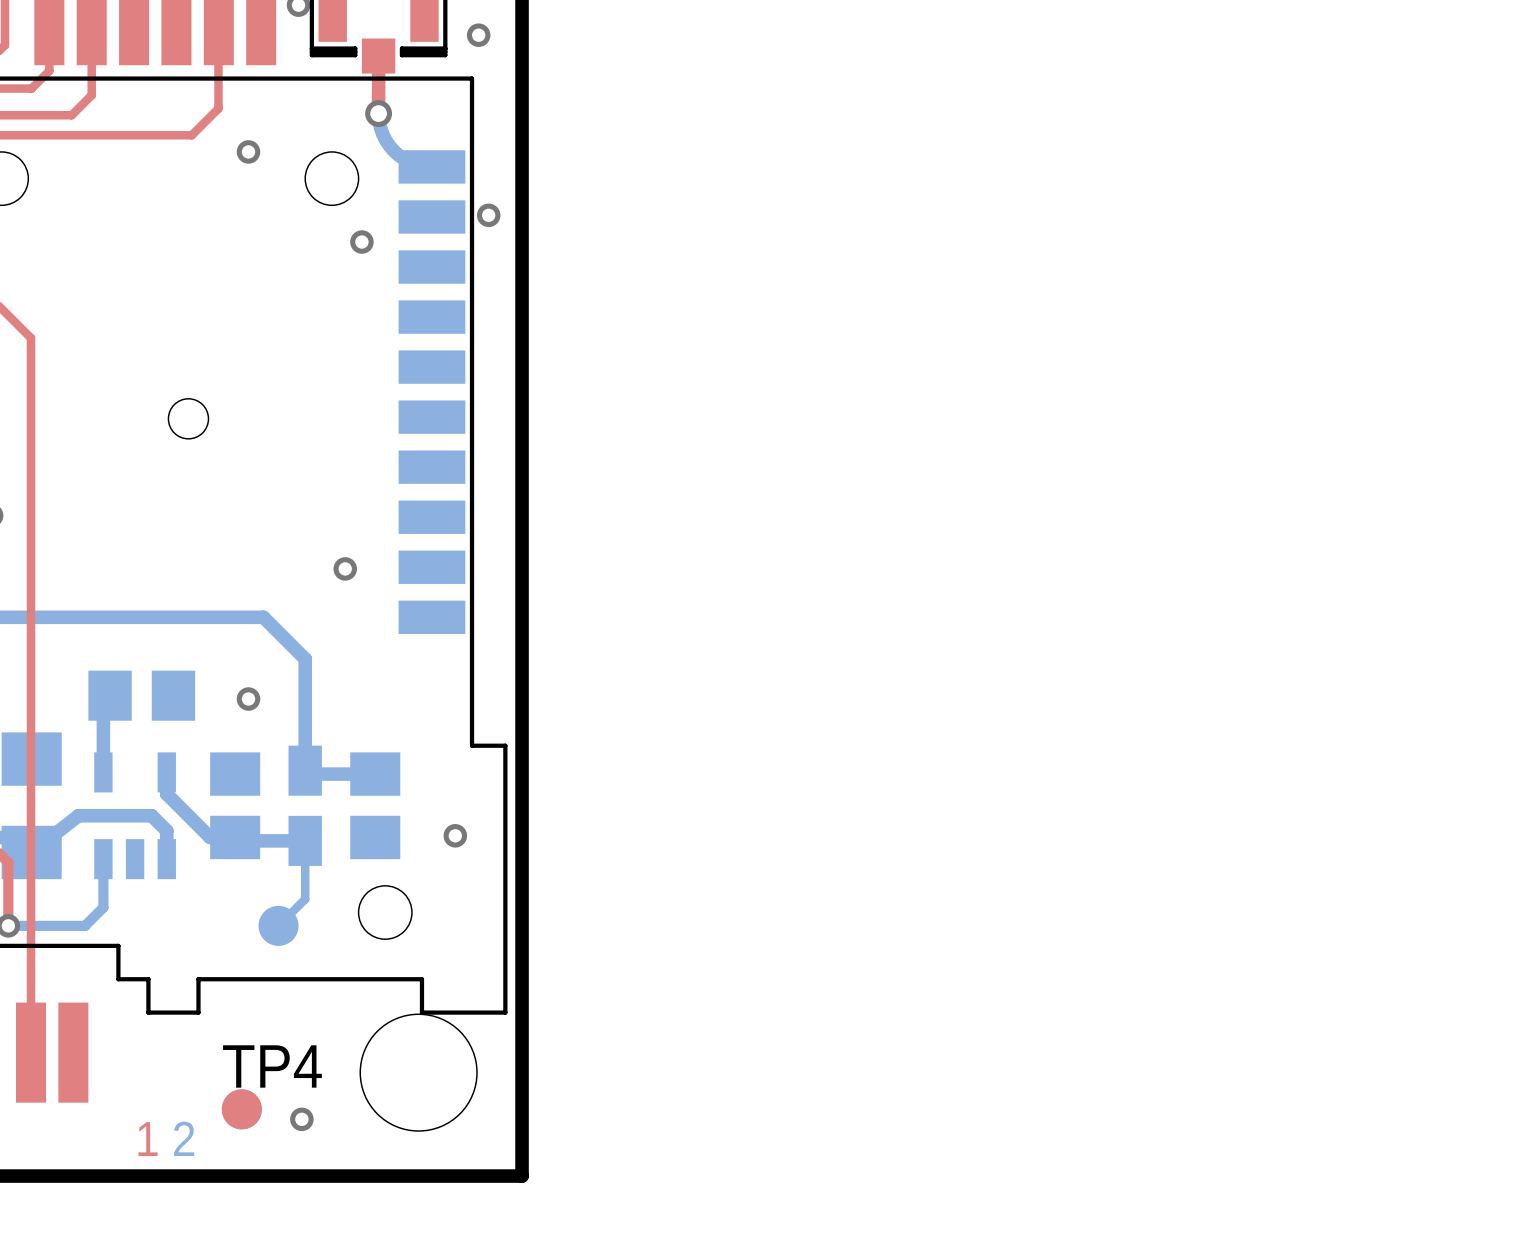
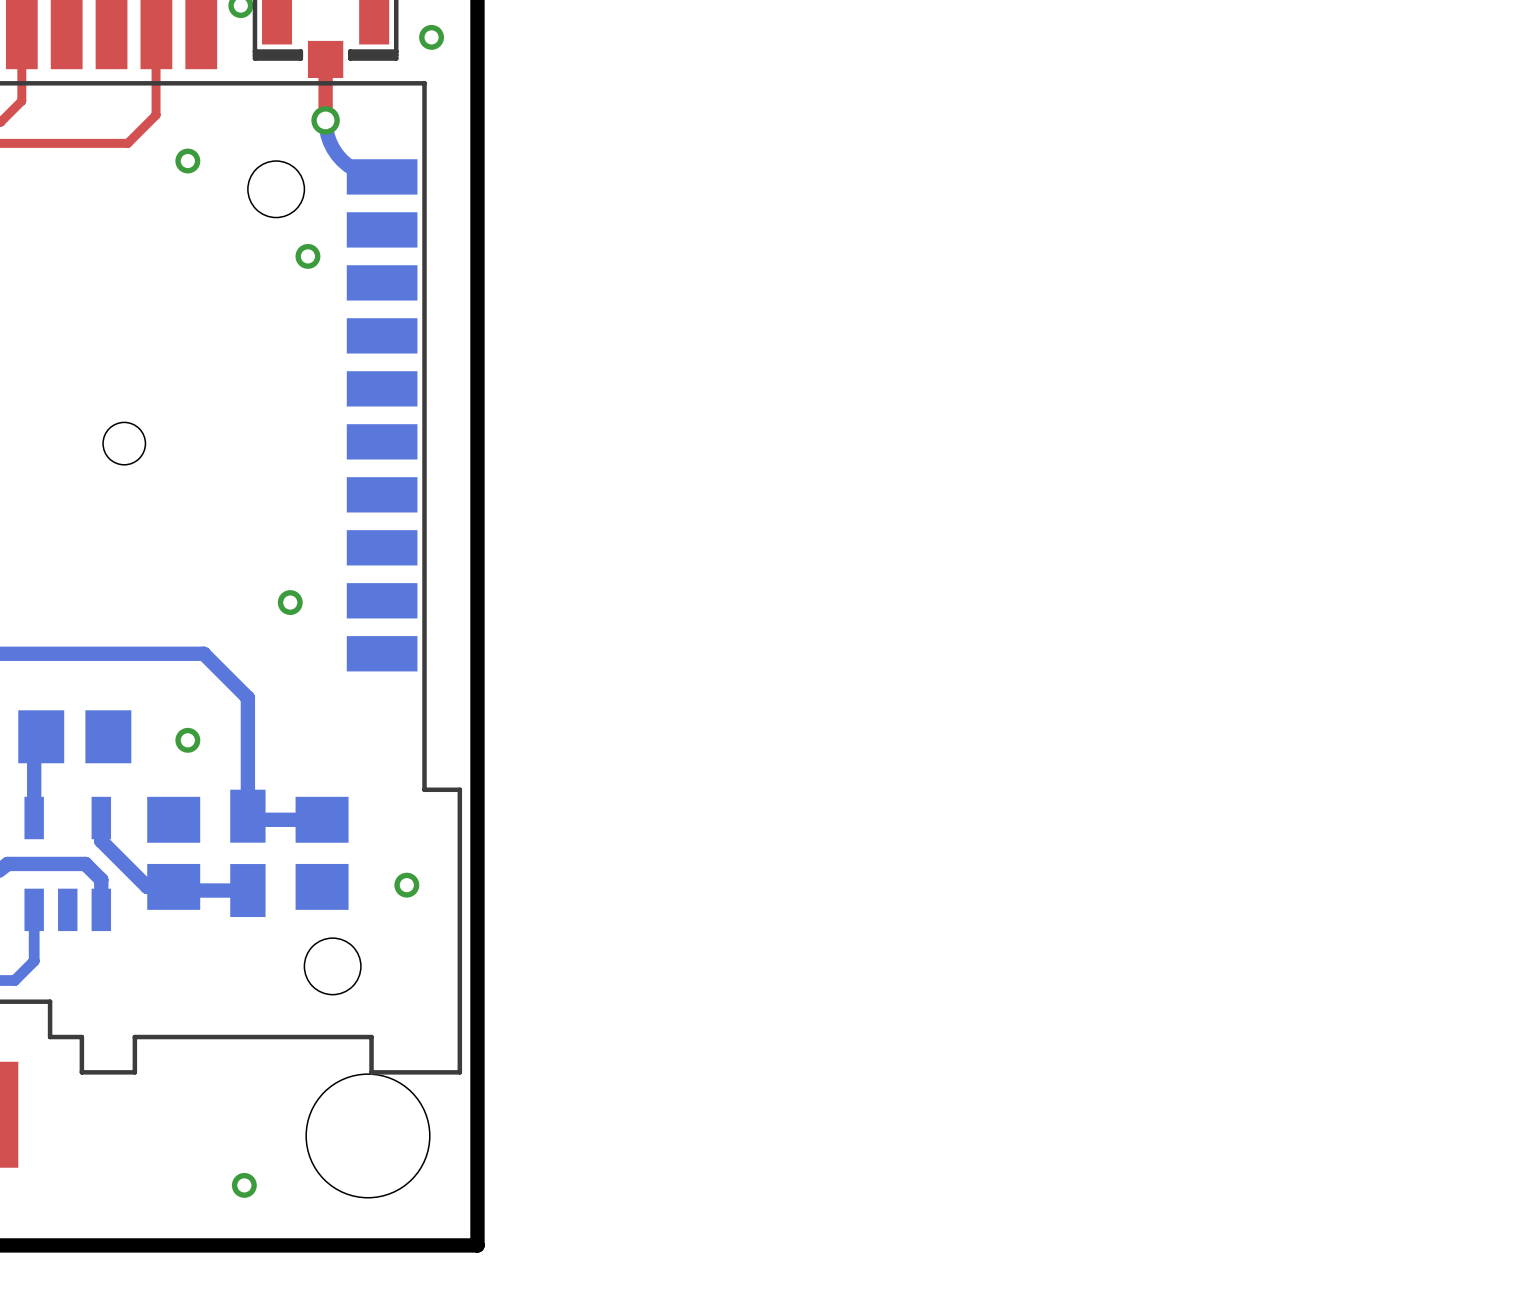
via: (488, 215) -> none
bottom track: (305, 840) (305, 899) (278, 925) -> none
part: (278, 925) -> none
TP4: (241, 1109) -> none
text: 2 (184, 1138) -> none
text: 1 (148, 1139) -> none

